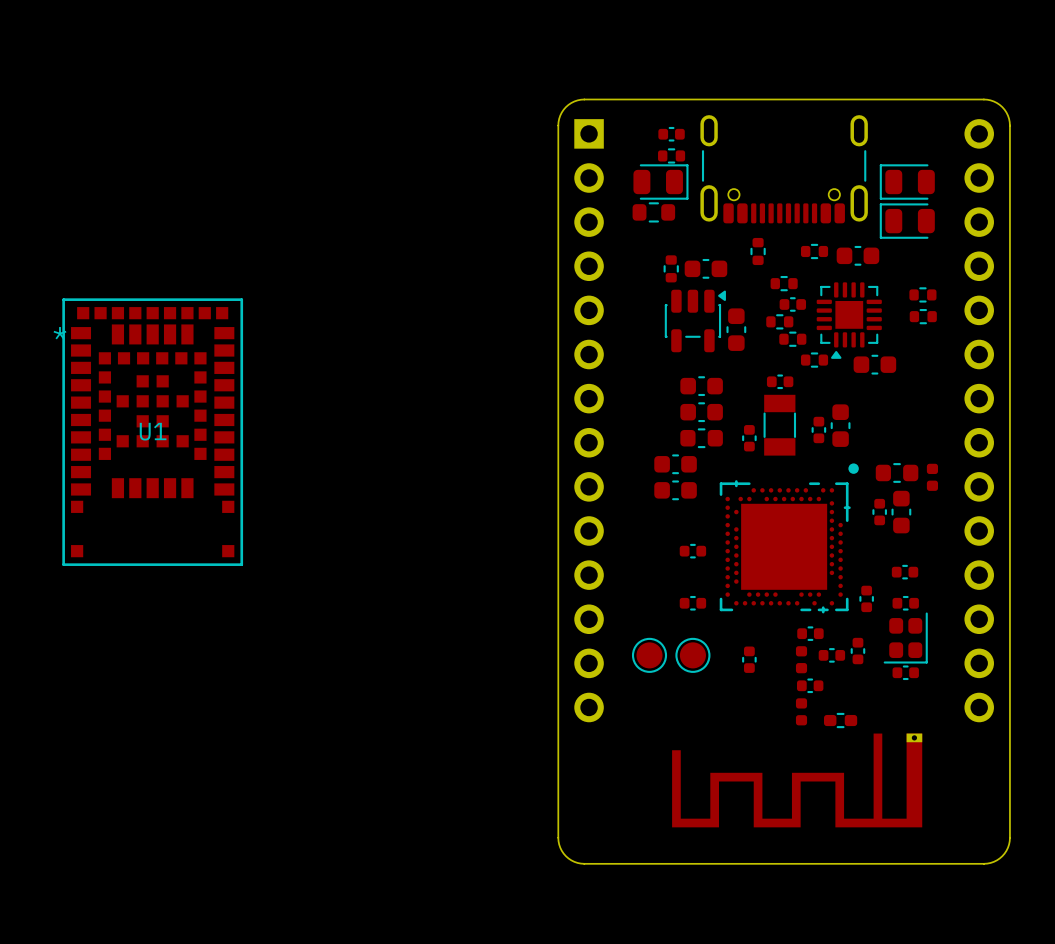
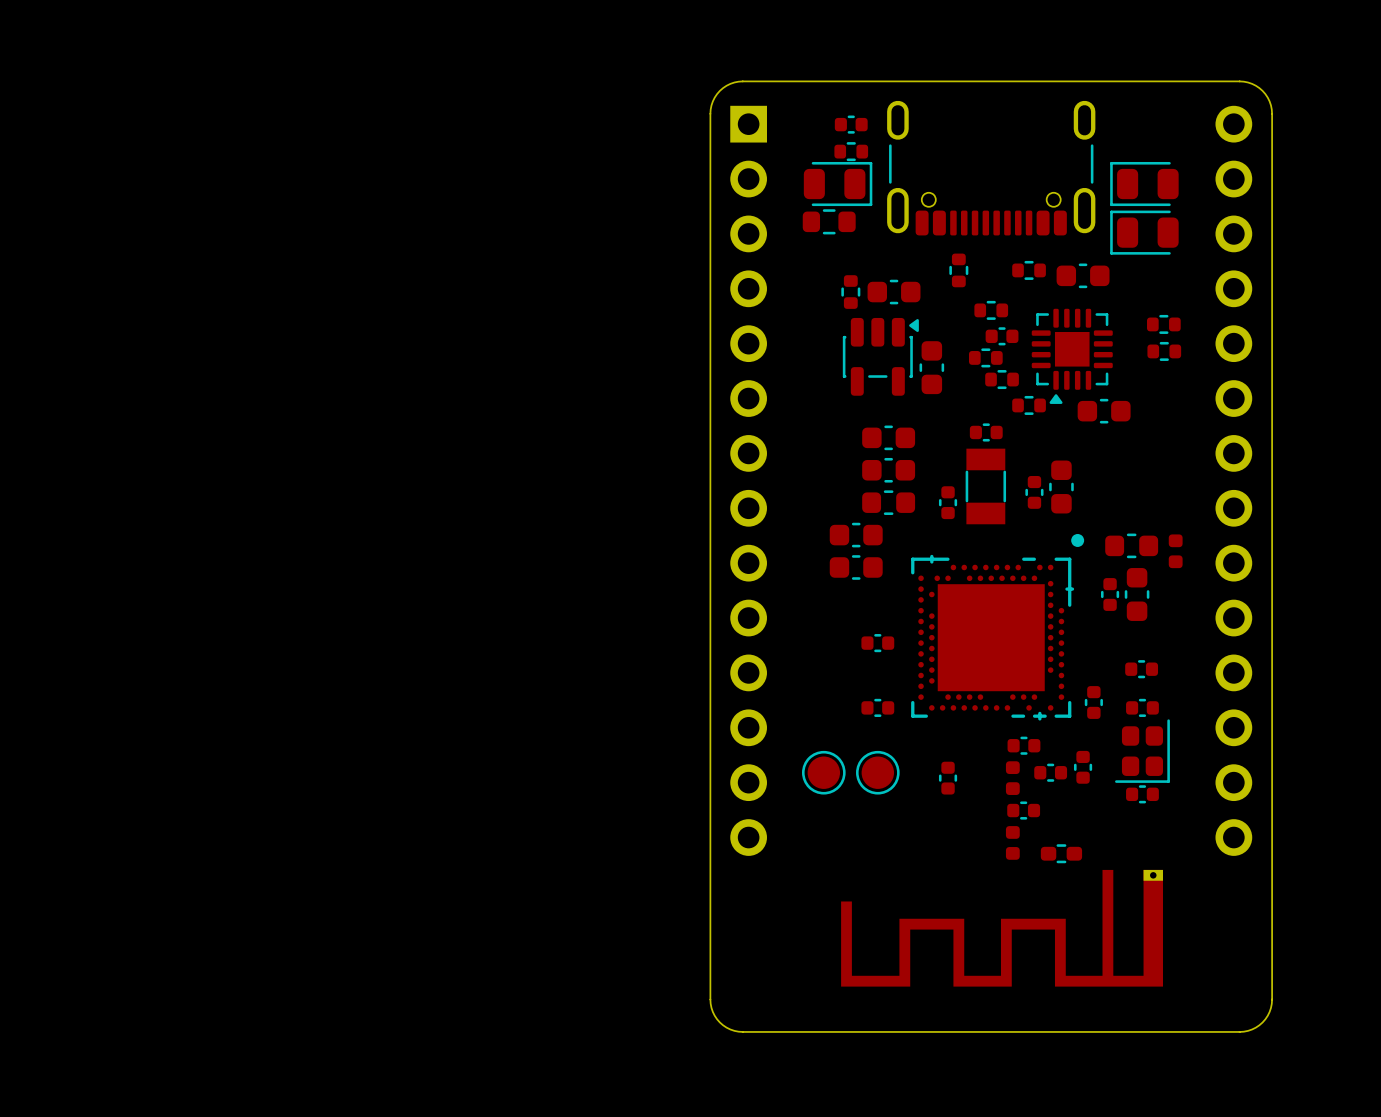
U1: (152, 432) -> none
part footprint: [672, 733, 923, 828] -> [841, 869, 1163, 987]

